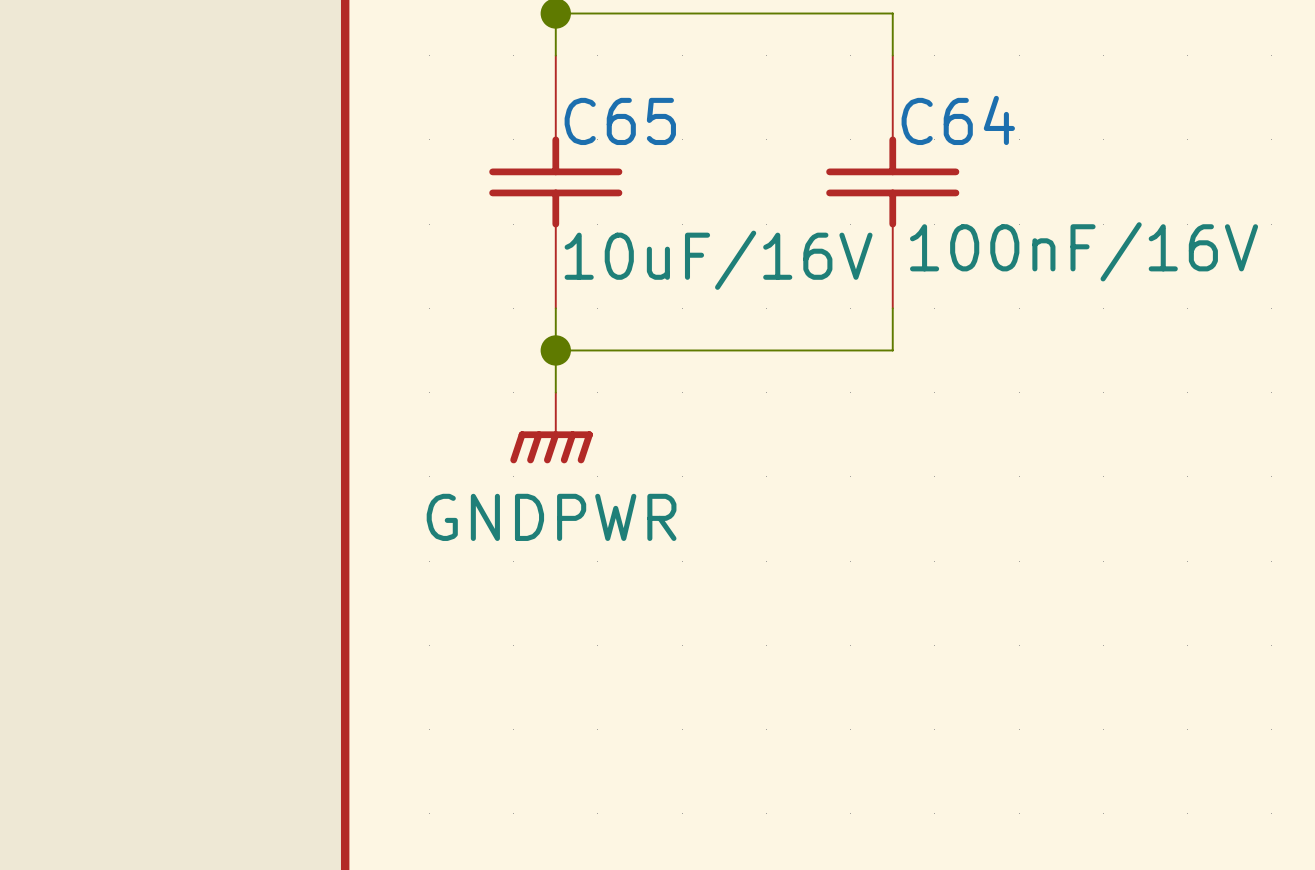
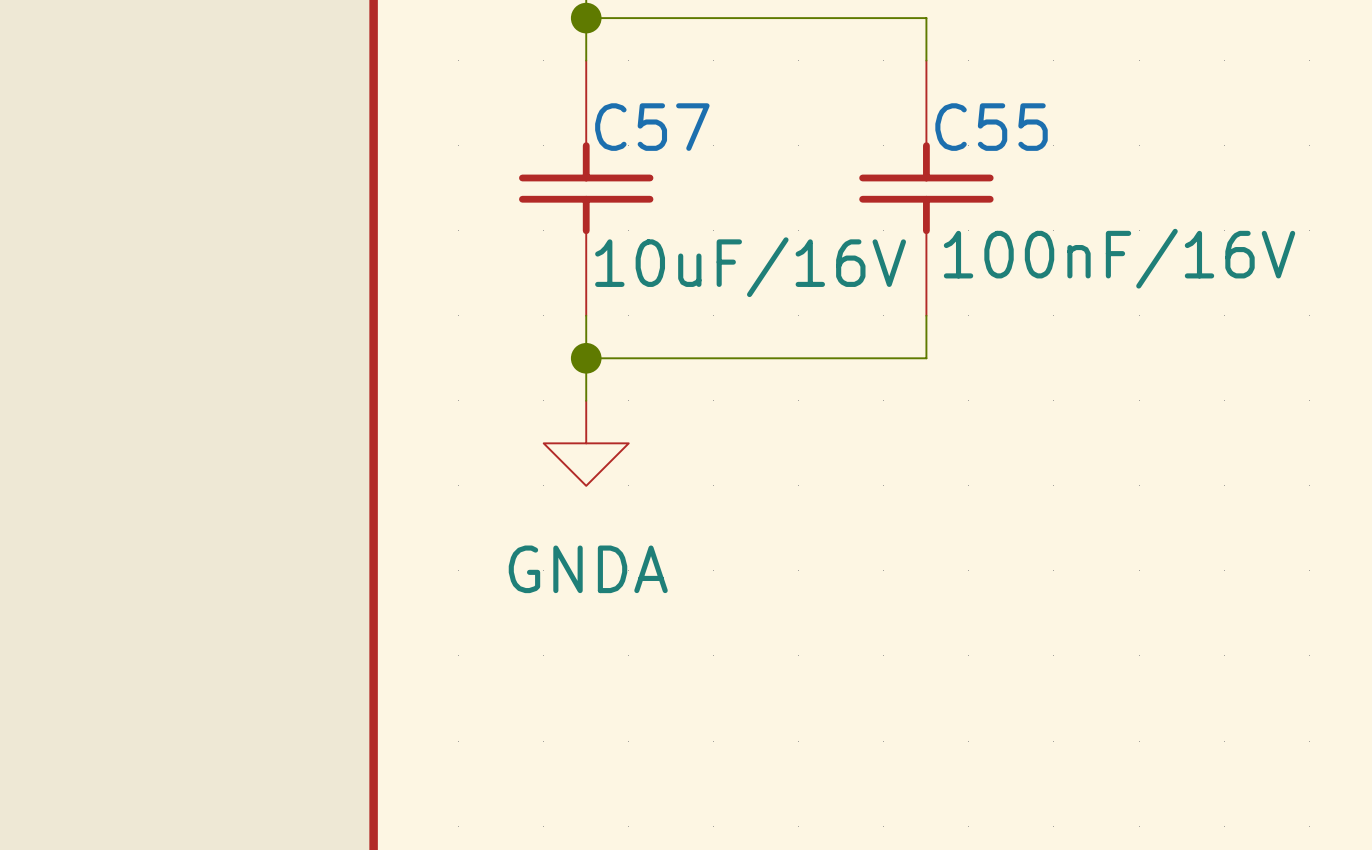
C64 name: C64 (958, 120) -> C55 (991, 127)
C65 name: C65 (620, 121) -> C57 (652, 127)
power symbol: GNDPWR (551, 427) -> GNDA (586, 443)

